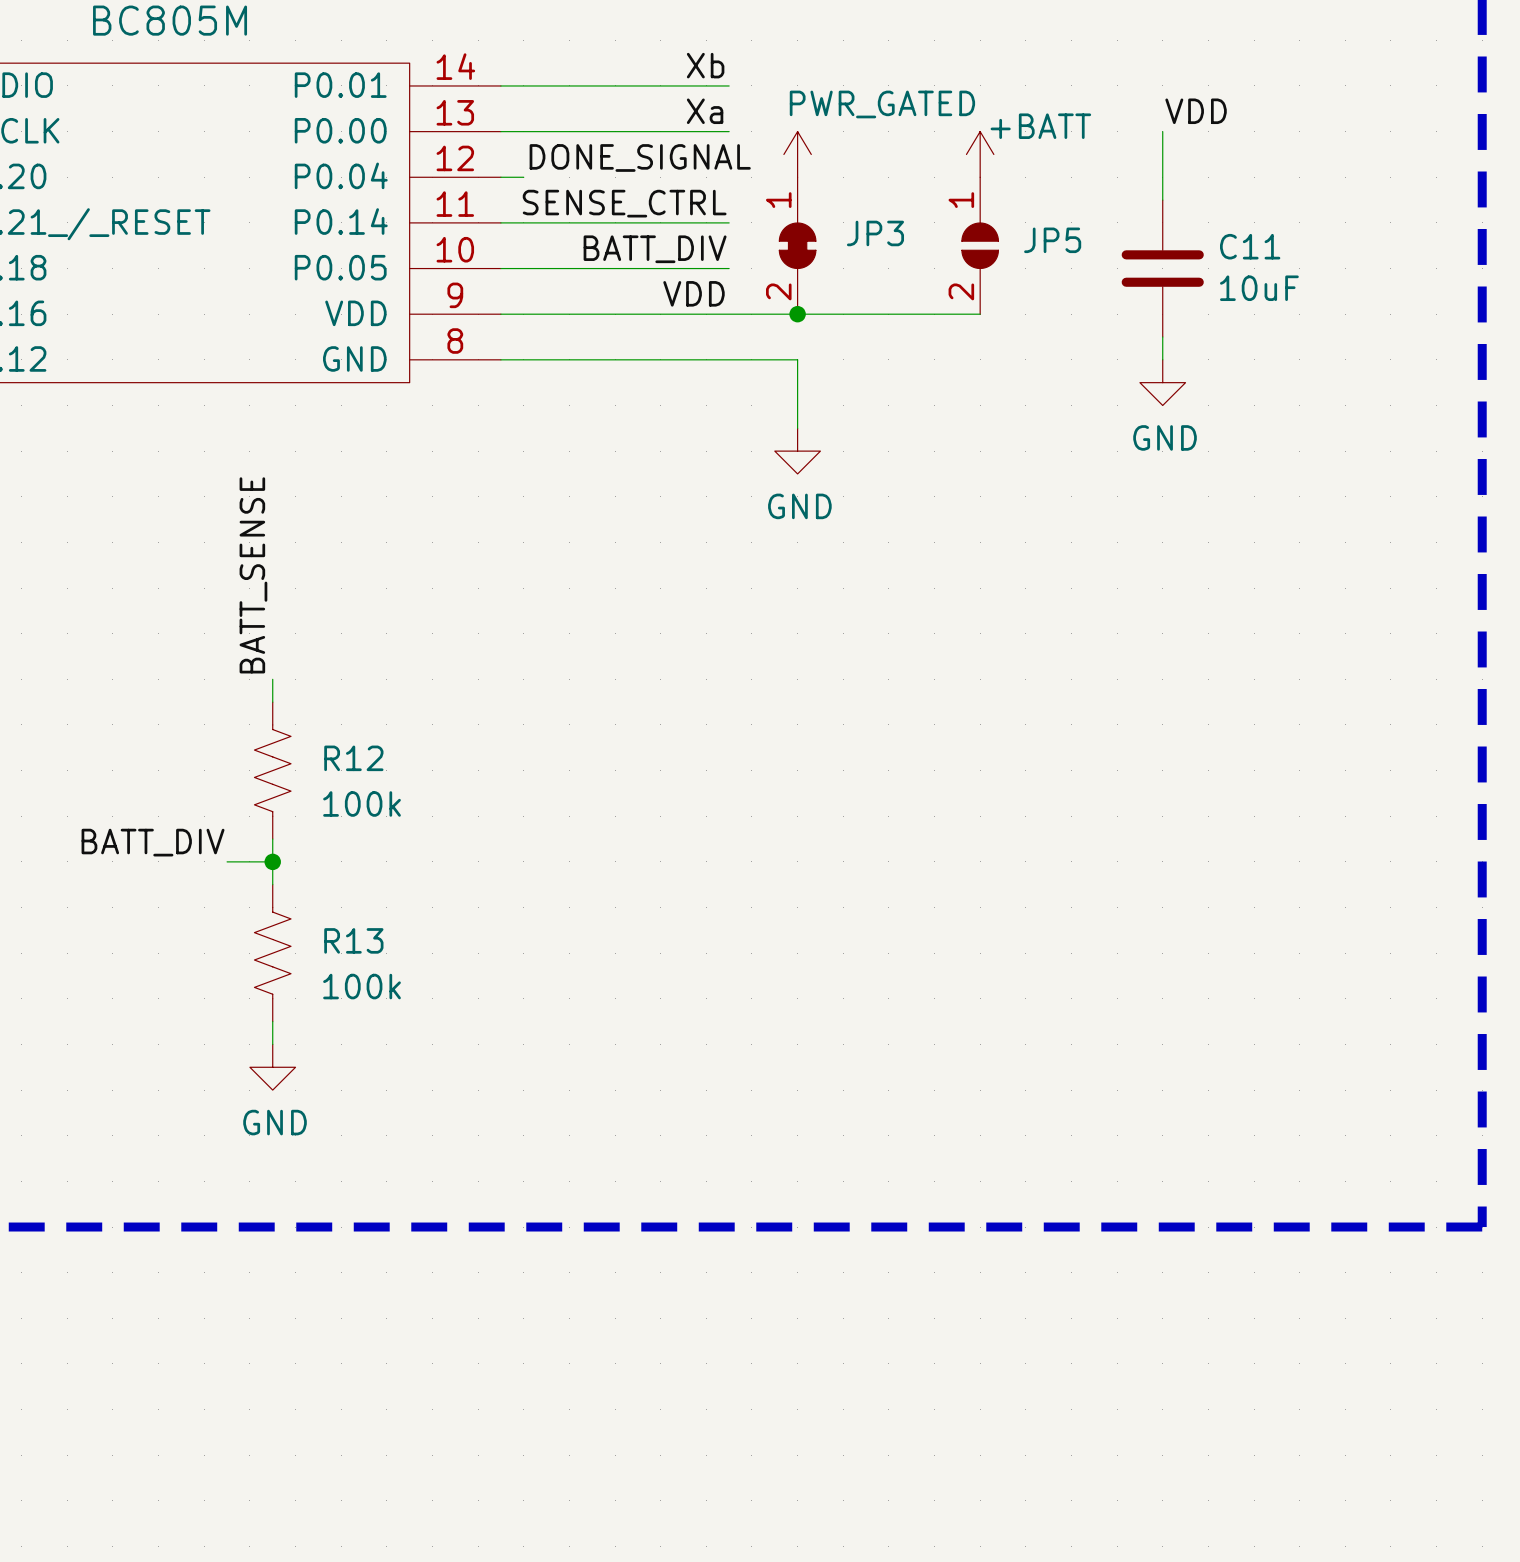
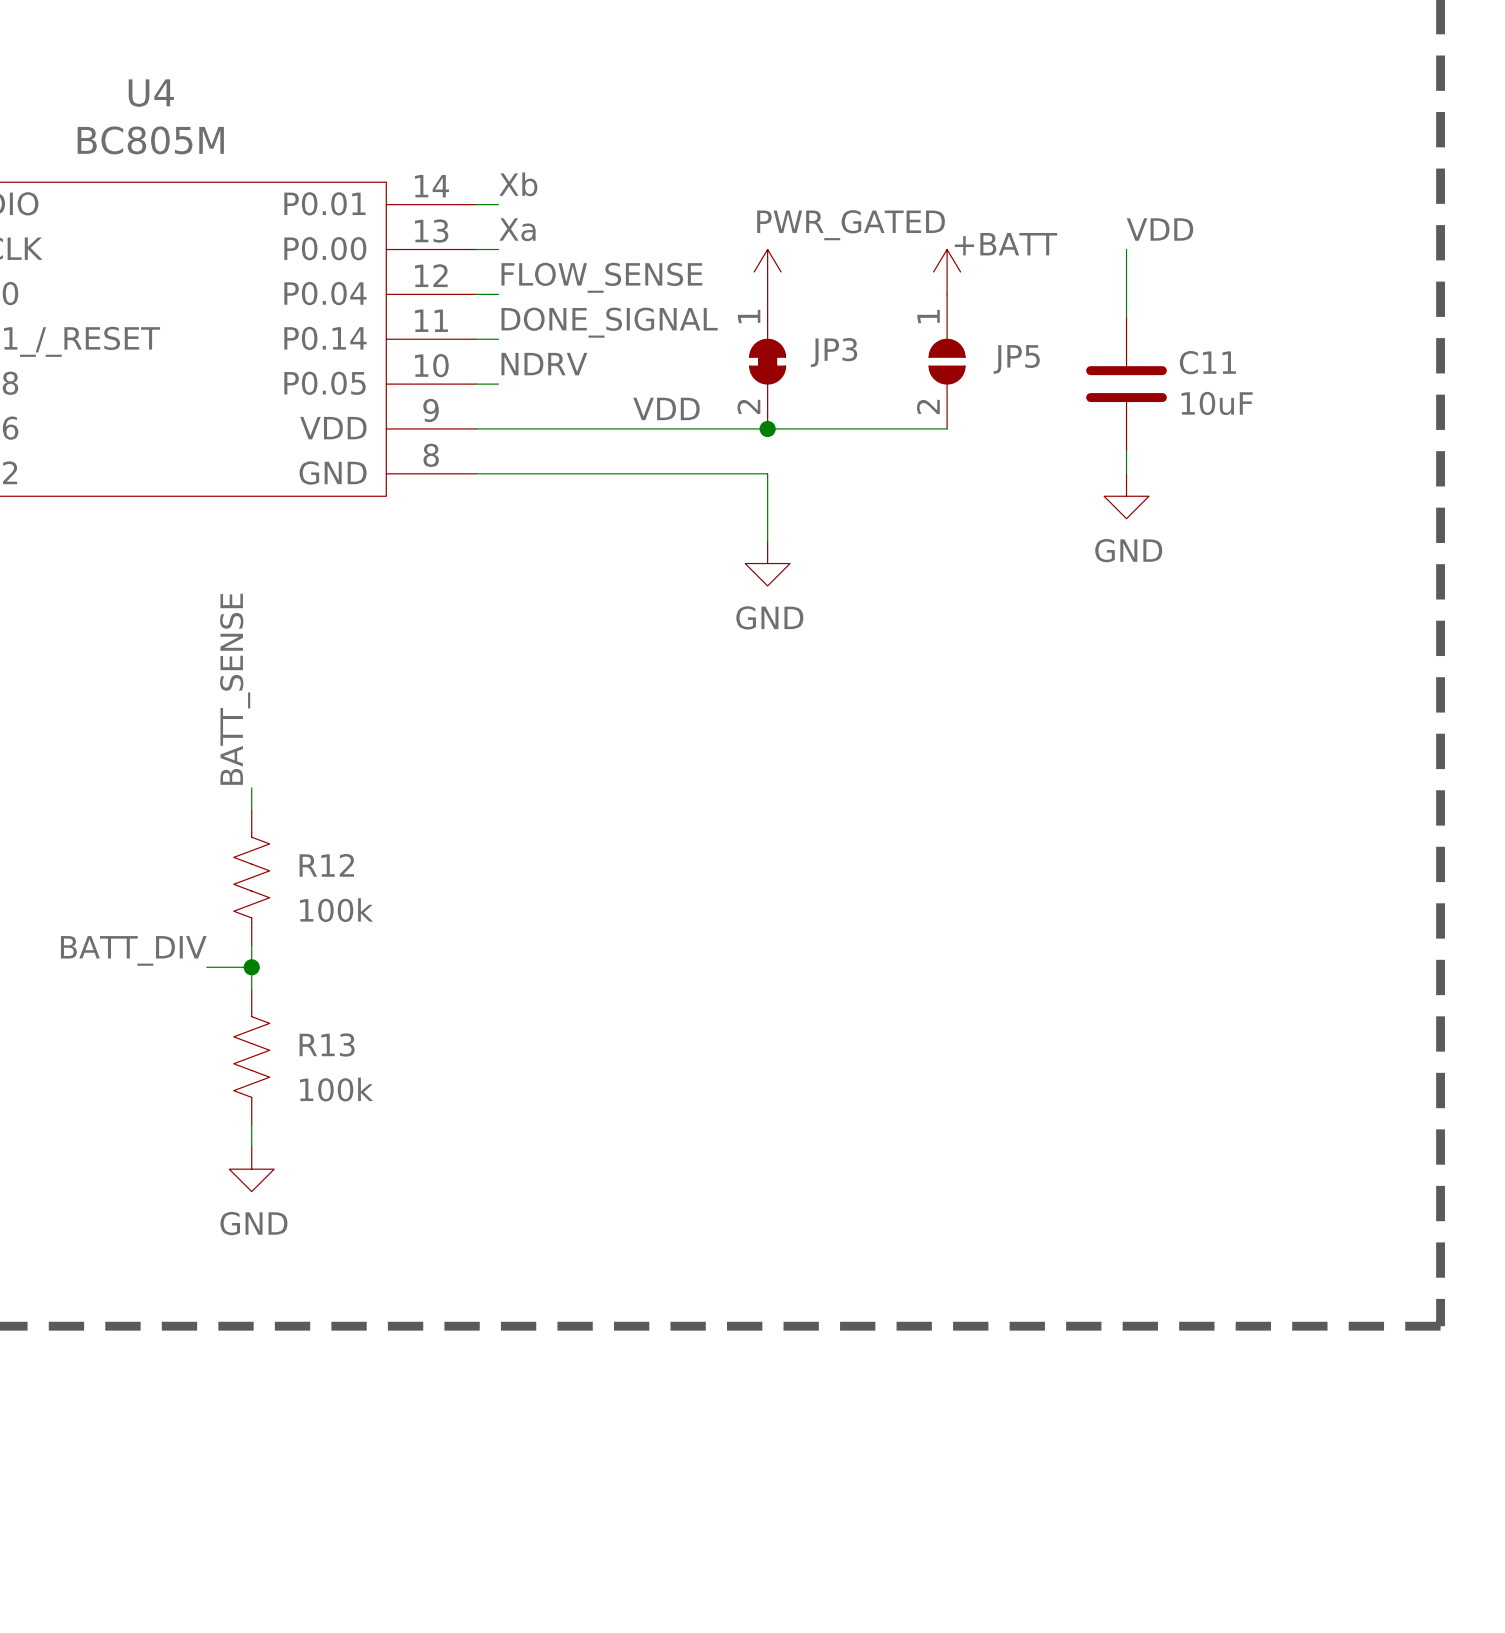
label position: Xb (705, 65) -> Xb (518, 184)
wire: (523, 85) (729, 85) -> none
label position: Xa (705, 111) -> Xa (517, 229)
wire: (523, 131) (729, 131) -> none
label: DONE_SIGNAL (640, 157) -> FLOW_SENSE (601, 277)
label: SENSE_CTRL (624, 203) -> none
label: none -> DONE_SIGNAL (609, 322)
wire: (523, 222) (729, 222) -> none
label: none -> NDRV (544, 364)
label: BATT_DIV (655, 249) -> none
wire: (523, 268) (729, 268) -> none

